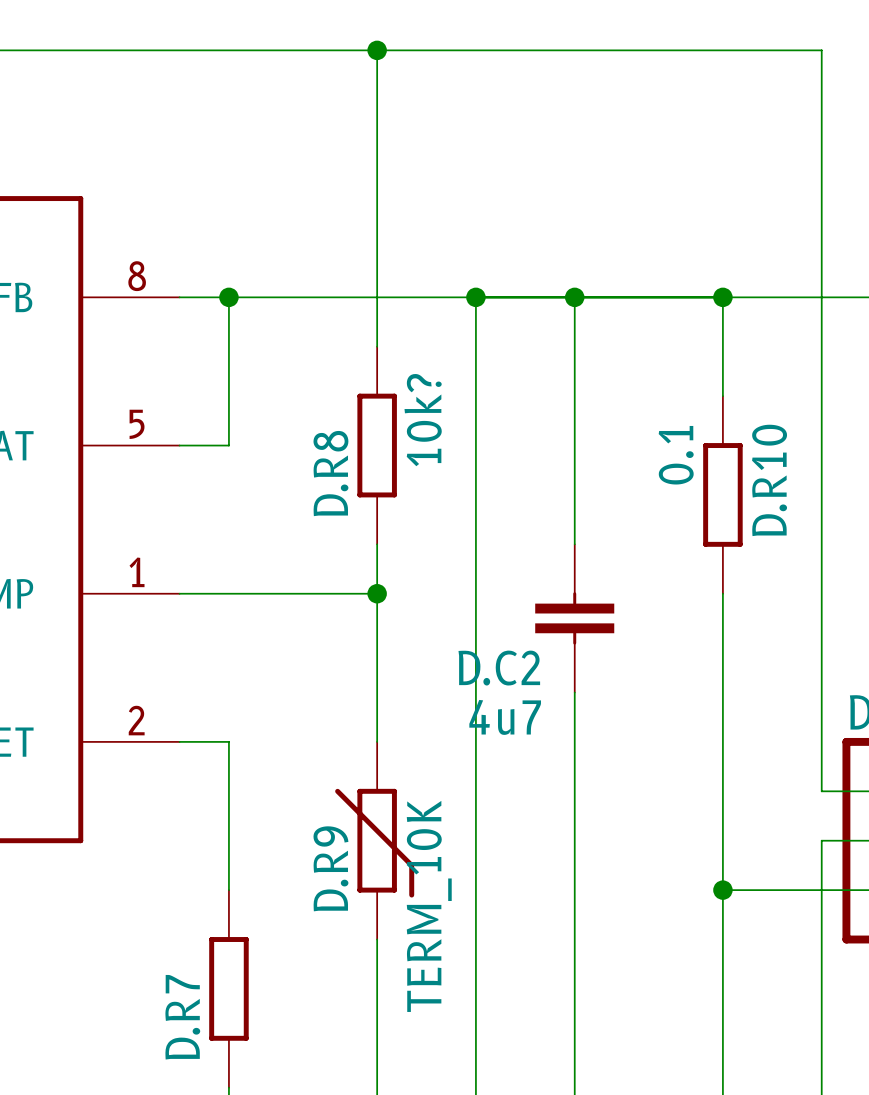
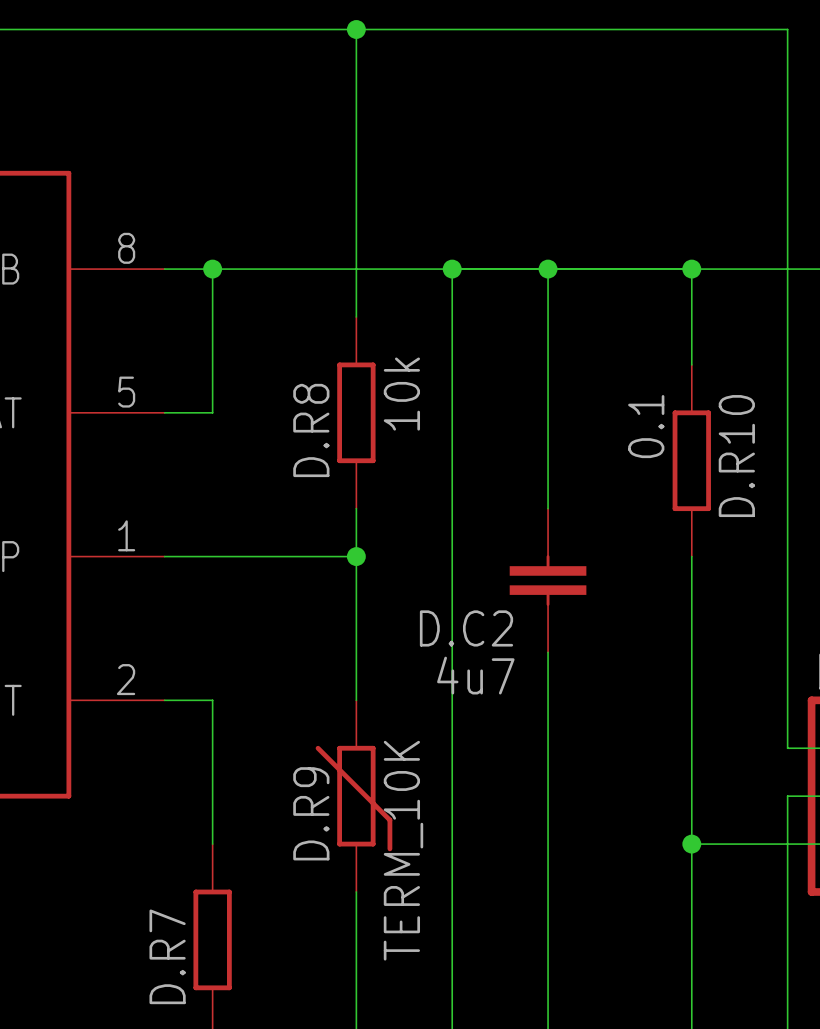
D.R8 value: 10k? (423, 420) -> 10k (401, 394)

